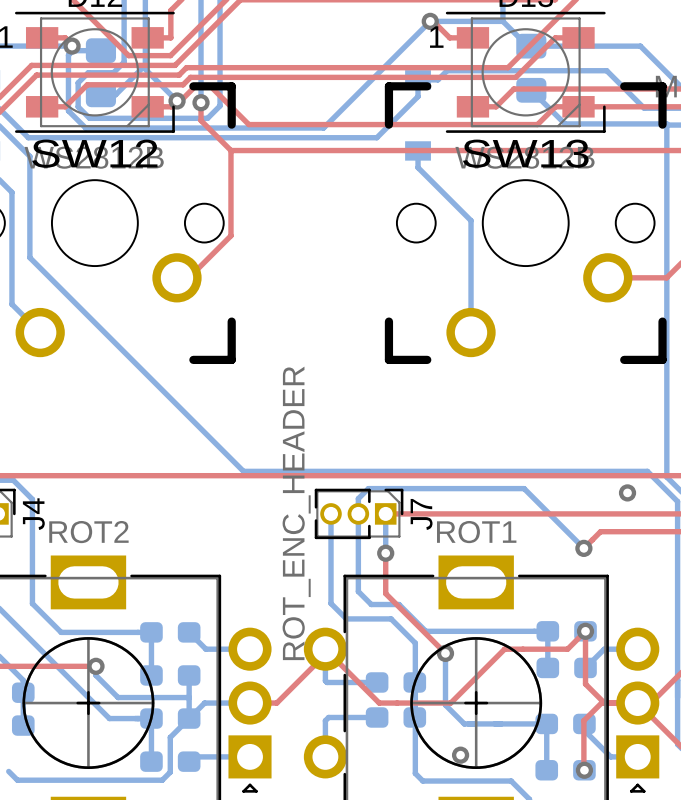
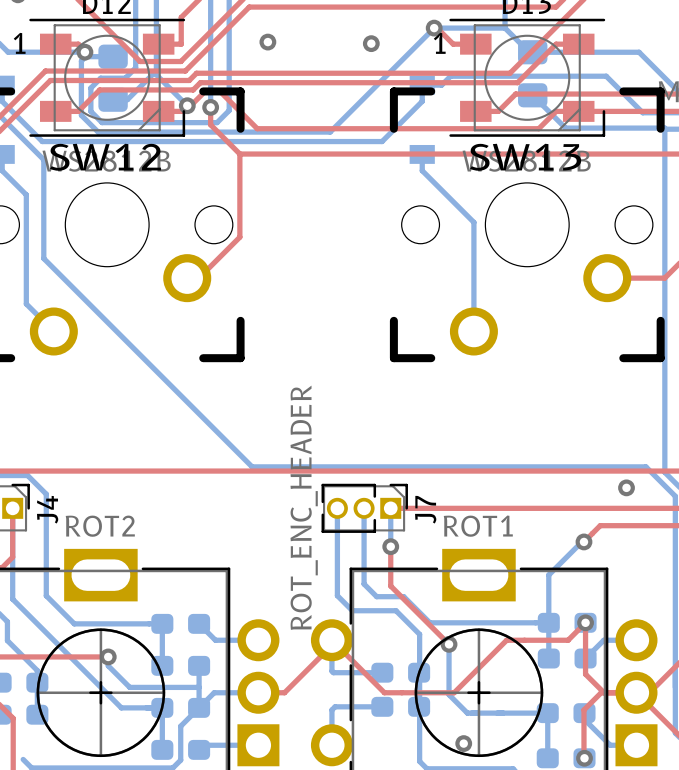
via: none -> (267, 42)
via: none -> (371, 43)
bottom track: (358, 513) (358, 498) (368, 488) (524, 488) (583, 548) -> (548, 622) (548, 575) (583, 541)

